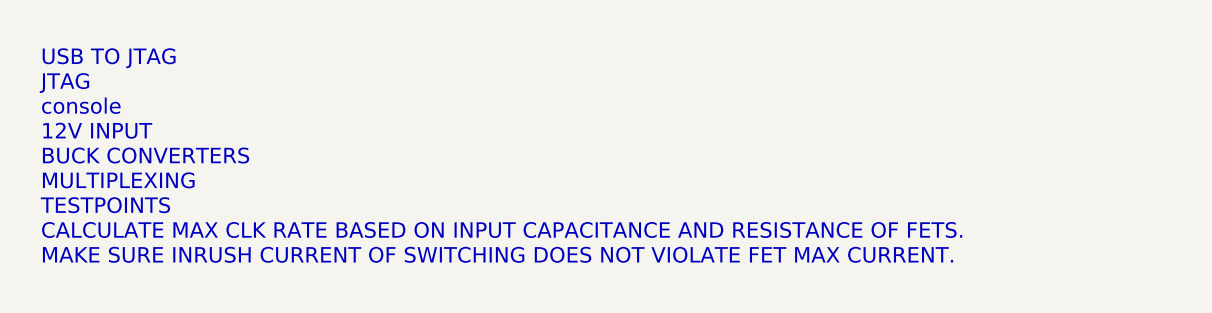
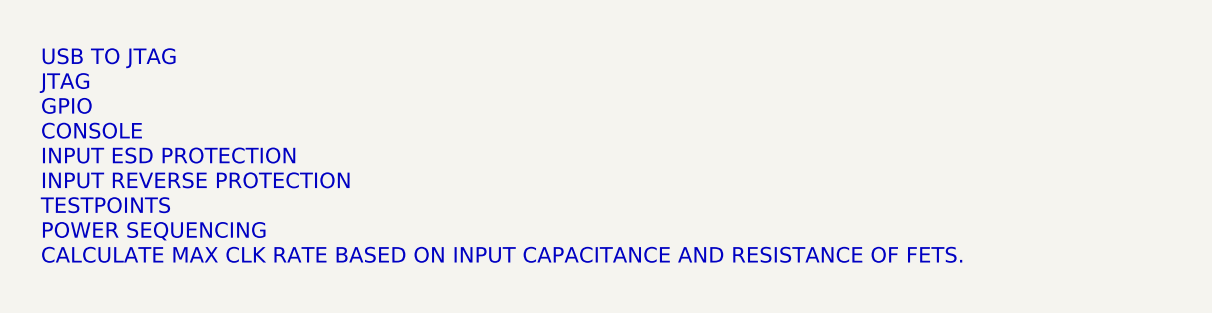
text: console (81, 105) -> GPIO (66, 105)
text: 12V INPUT (97, 130) -> CONSOLE (92, 130)
text: BUCK CONVERTERS (146, 155) -> INPUT ESD PROTECTION (169, 155)
text: MULTIPLEXING (118, 180) -> INPUT REVERSE PROTECTION (196, 180)
text: CALCULATE MAX CLK RATE BASED ON INPUT CAPACITANCE AND RESISTANCE OF FETS. (502, 230) -> POWER SEQUENCING (154, 231)
text: MAKE SURE INRUSH CURRENT OF SWITCHING DOES NOT VIOLATE FET MAX CURRENT. (498, 254) -> CALCULATE MAX CLK RATE BASED ON INPUT CAPACITANCE AND RESISTANCE OF FETS. (502, 254)

